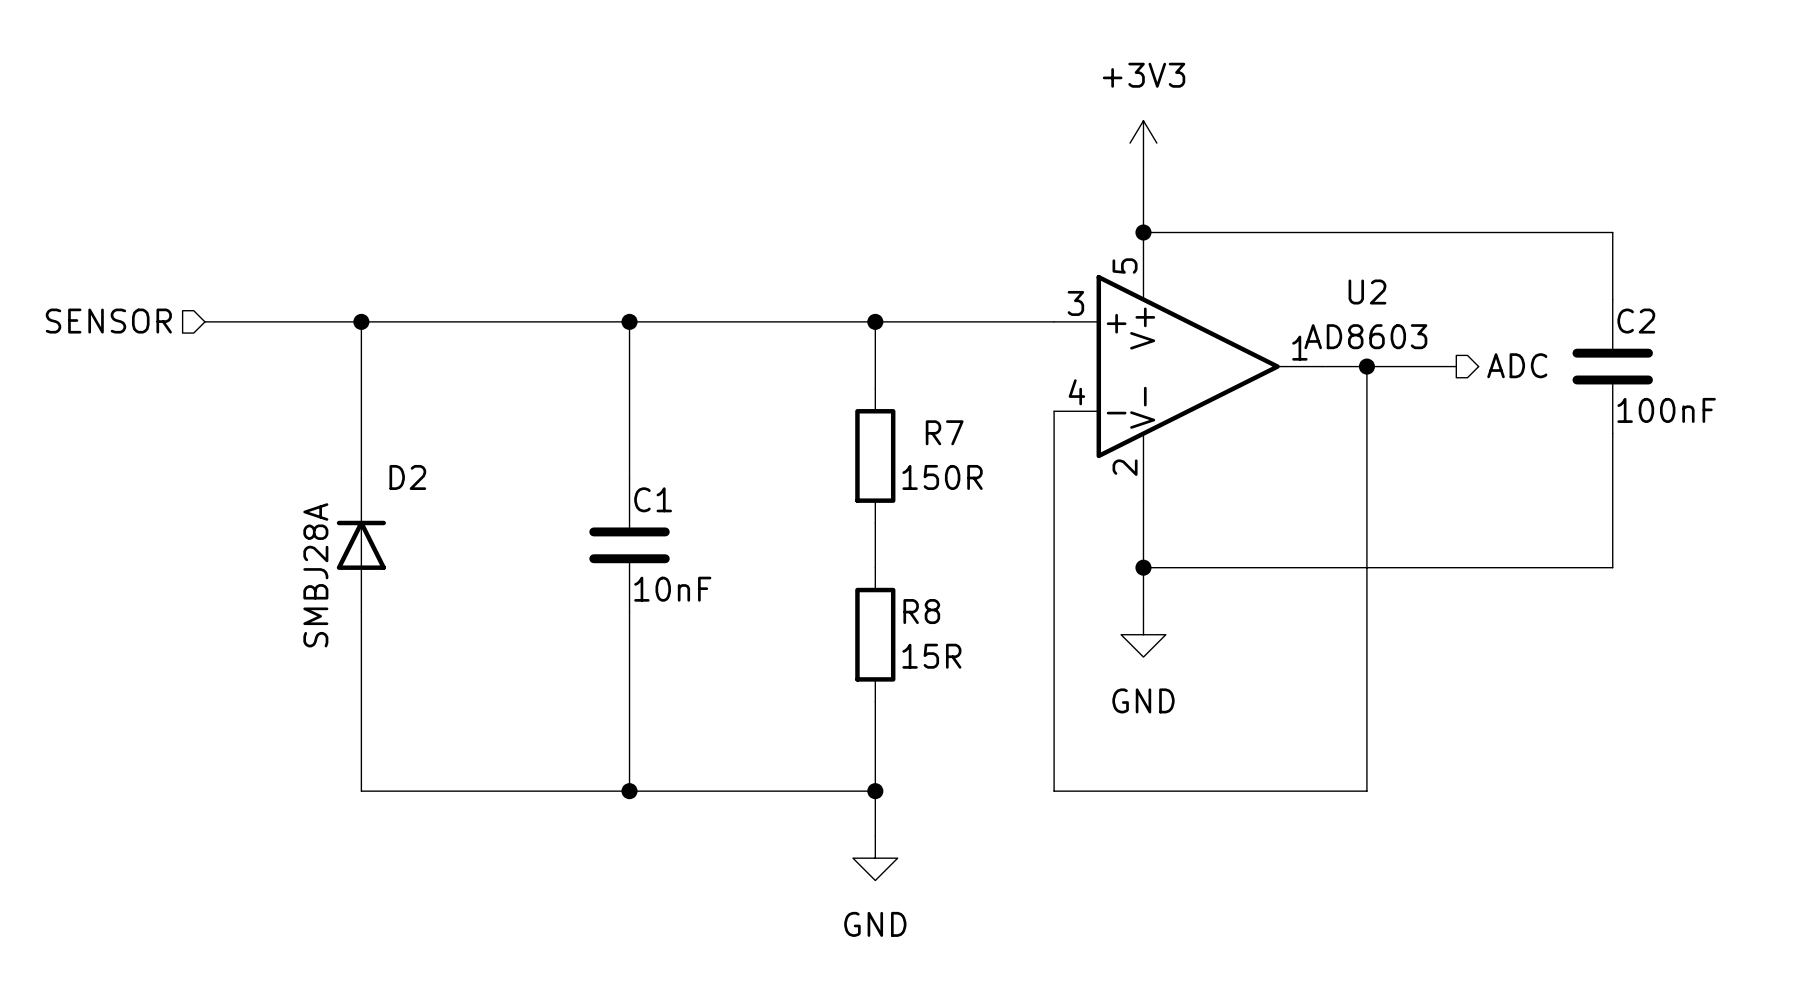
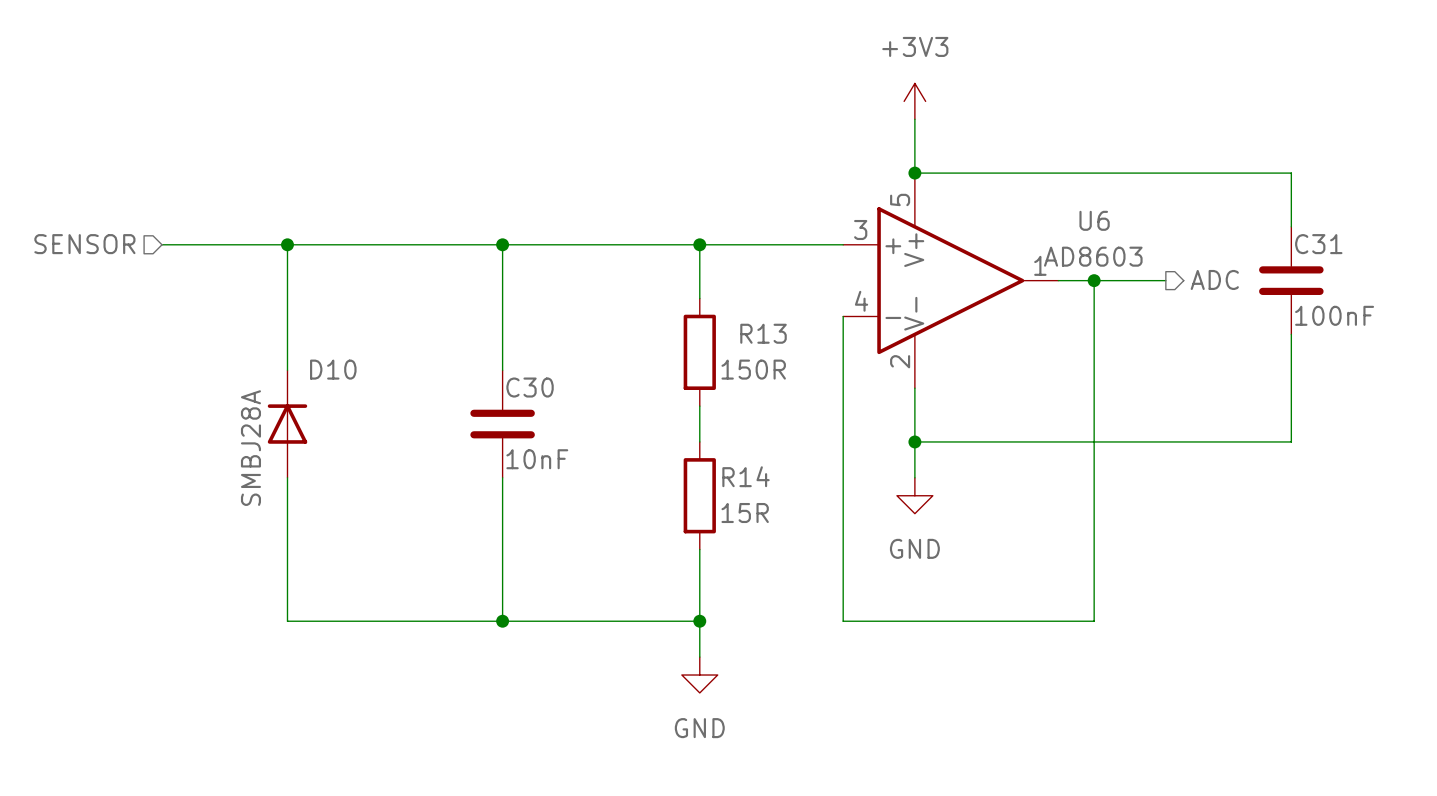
U2 name: U2 (1367, 292) -> U6 (1094, 220)
C2 name: C2 (1636, 321) -> C31 (1318, 244)
R7 name: R7 (944, 432) -> R13 (763, 333)
D2 name: D2 (407, 477) -> D10 (333, 369)
C1 name: C1 (653, 499) -> C30 (530, 387)
R8 name: R8 (921, 611) -> R14 (746, 476)

